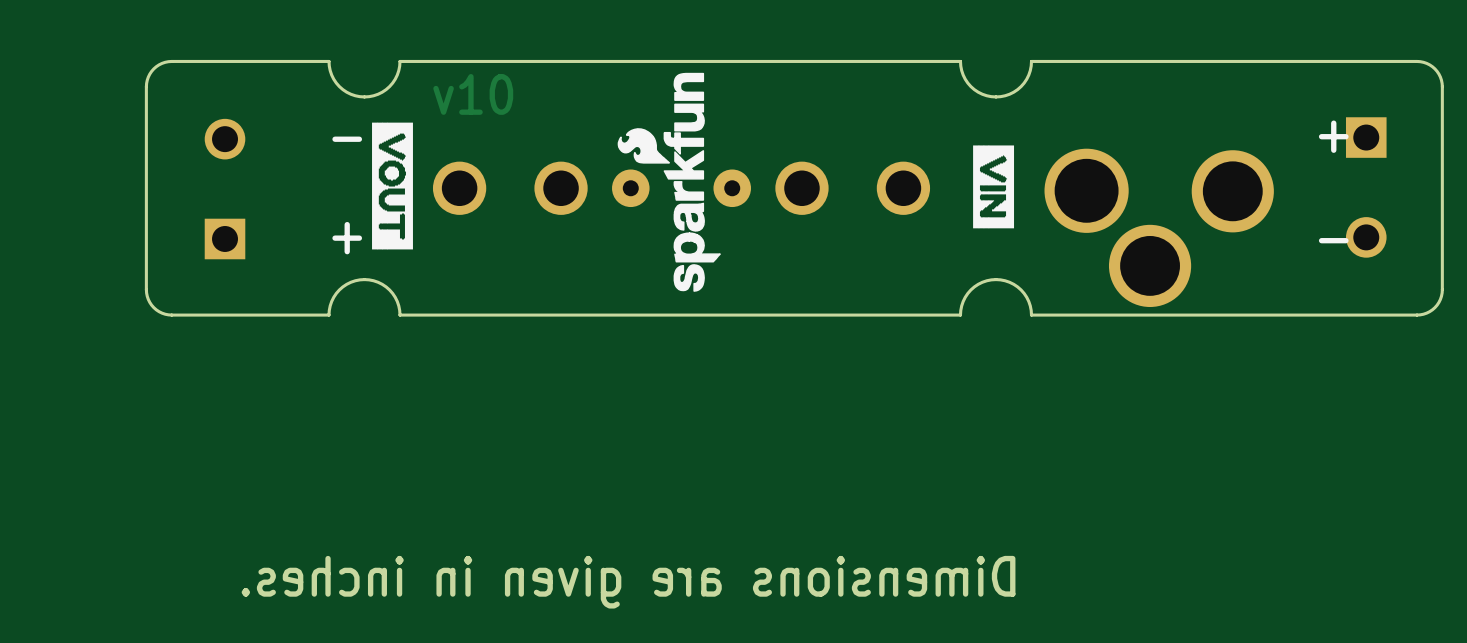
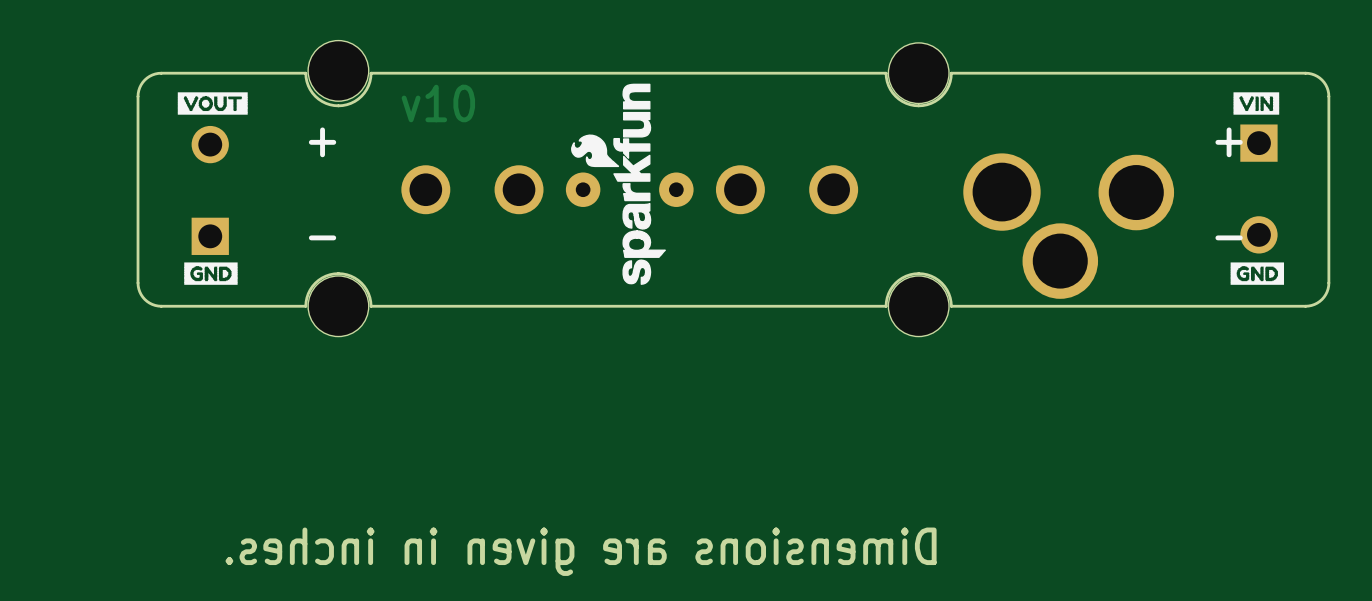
part: none -> (338, 70)
part: none -> (918, 73)
drawing: none -> [177, 92, 248, 115]
drawing: none -> [1233, 92, 1280, 115]
drawing: [372, 122, 413, 250] -> none
text: - (347, 139) -> + (322, 142)
drawing: [973, 145, 1015, 229] -> none
text: + (347, 238) -> - (322, 237)
drawing: none -> [184, 262, 238, 285]
drawing: none -> [1230, 262, 1285, 285]
part: none -> (338, 306)
part: none -> (918, 306)

